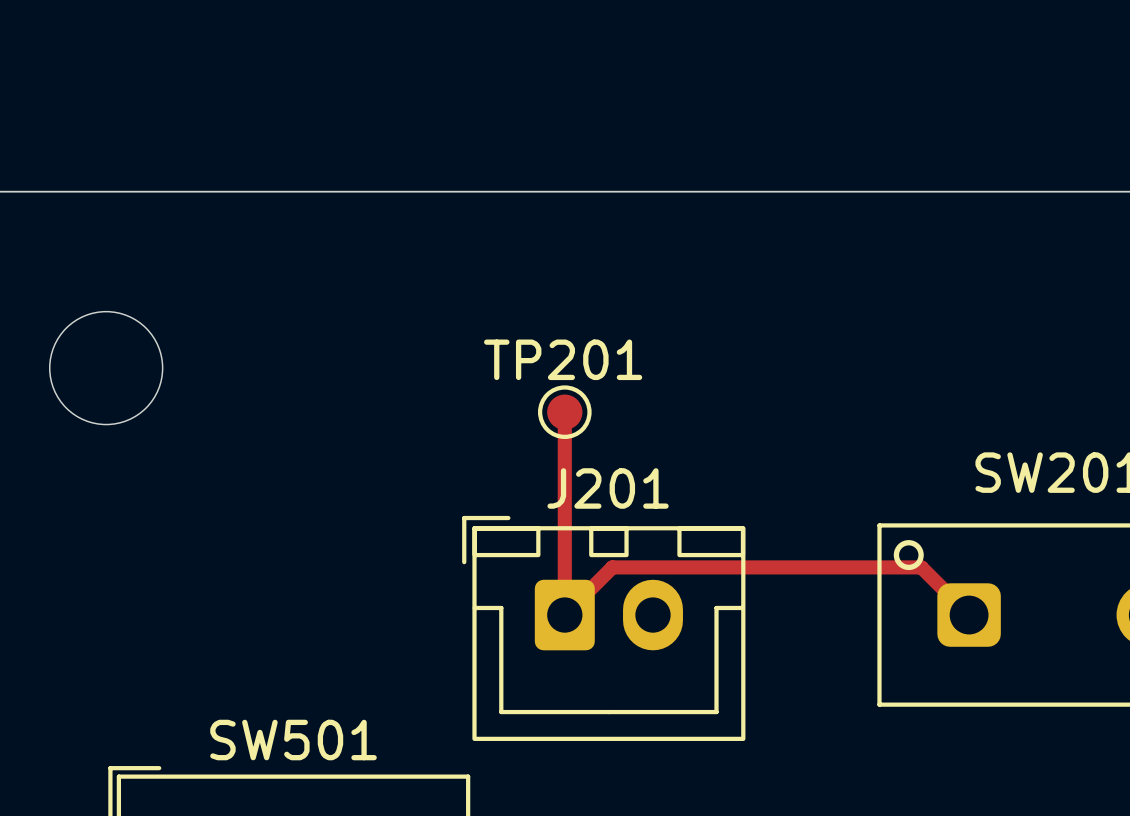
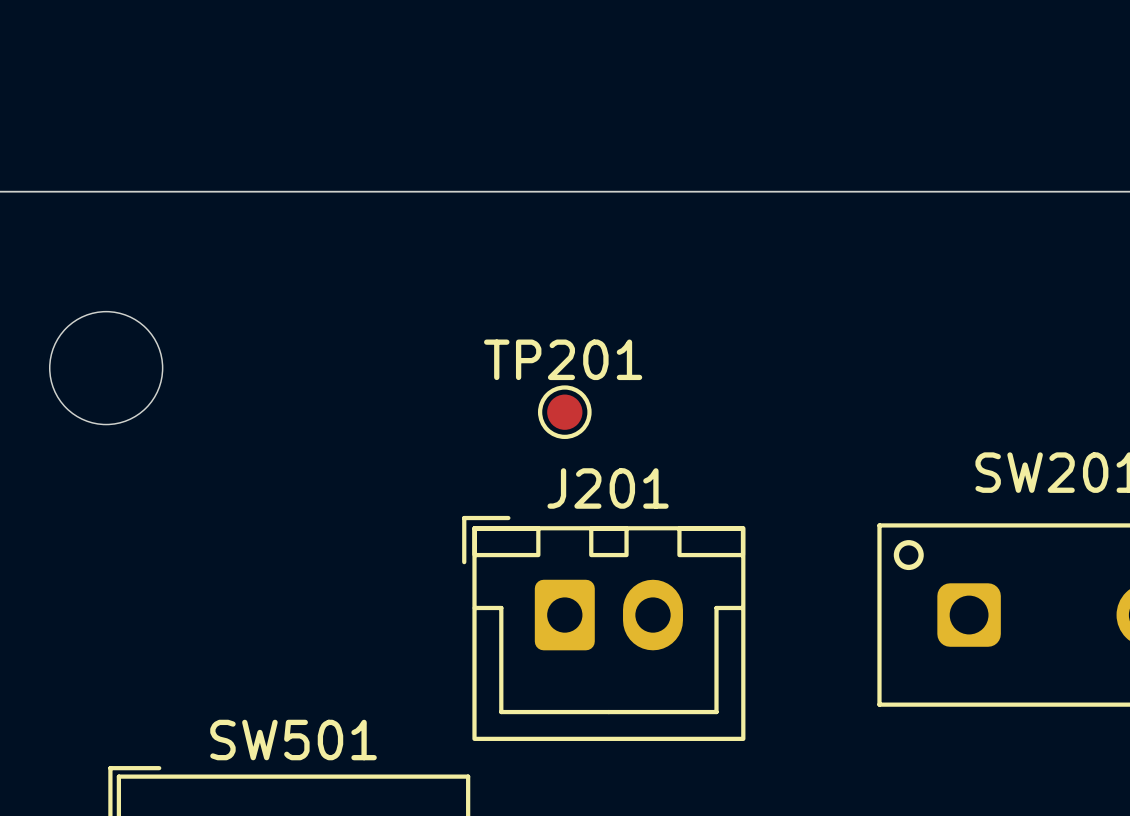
track: (564, 412) (564, 615) (612, 567) (921, 567) (969, 615) -> none

